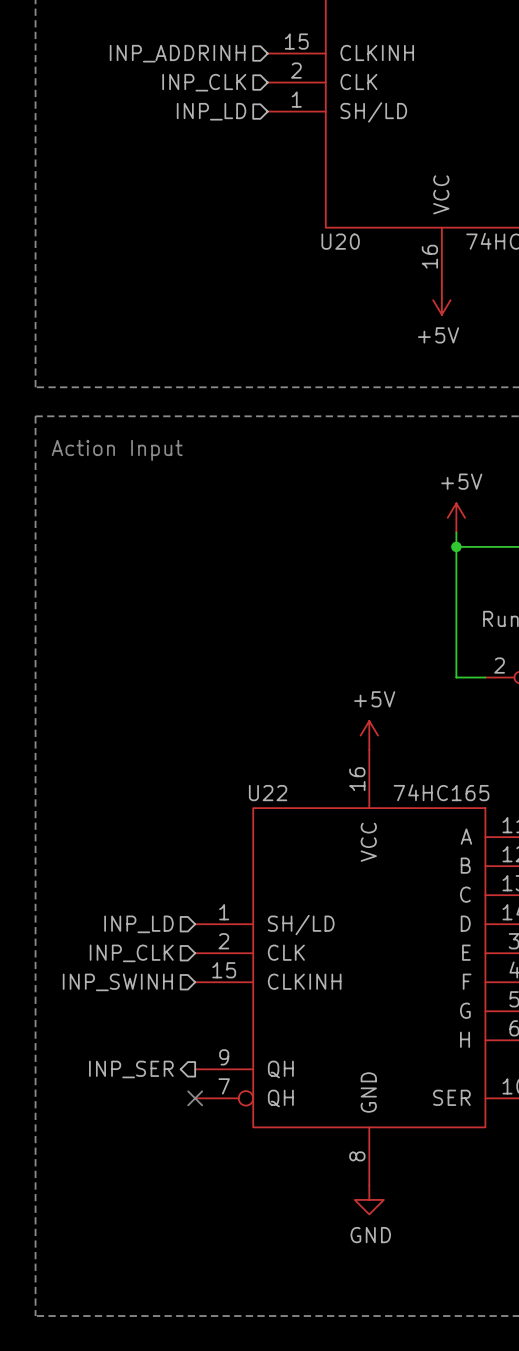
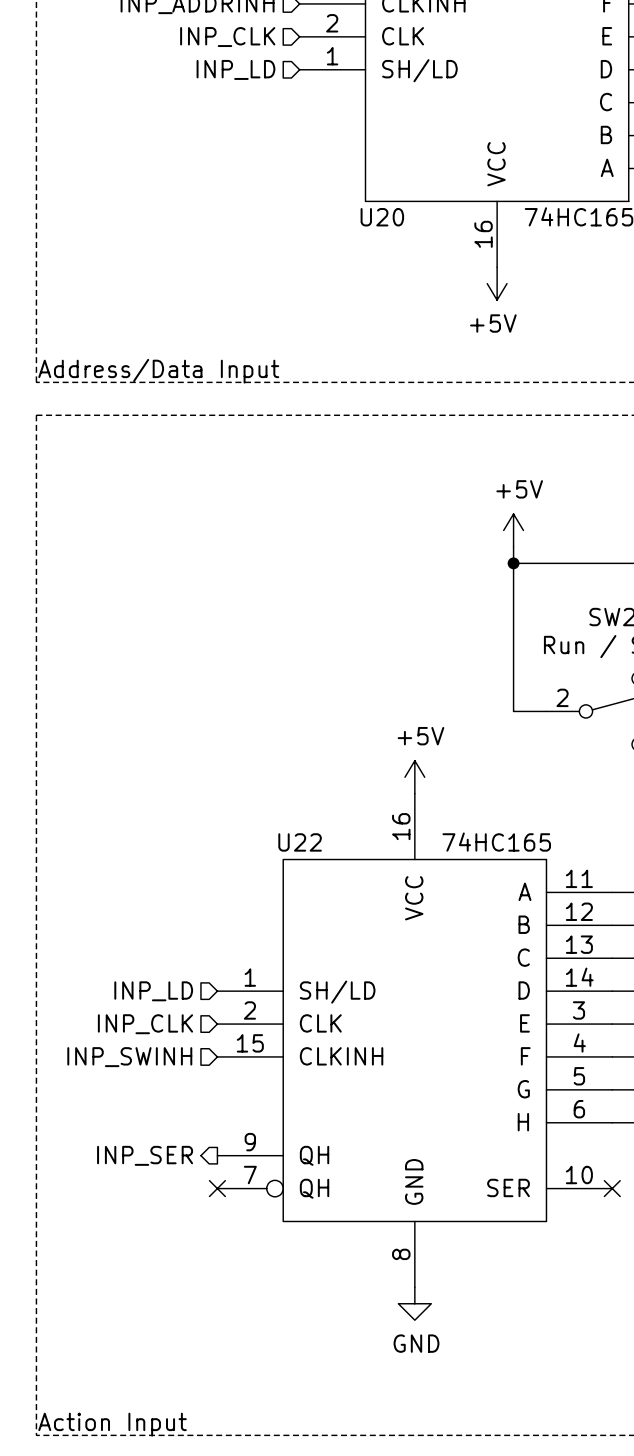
text: none -> Address/Data Input (158, 371)
text: Action Input (117, 450) -> none
text: none -> Action Input (112, 1424)

